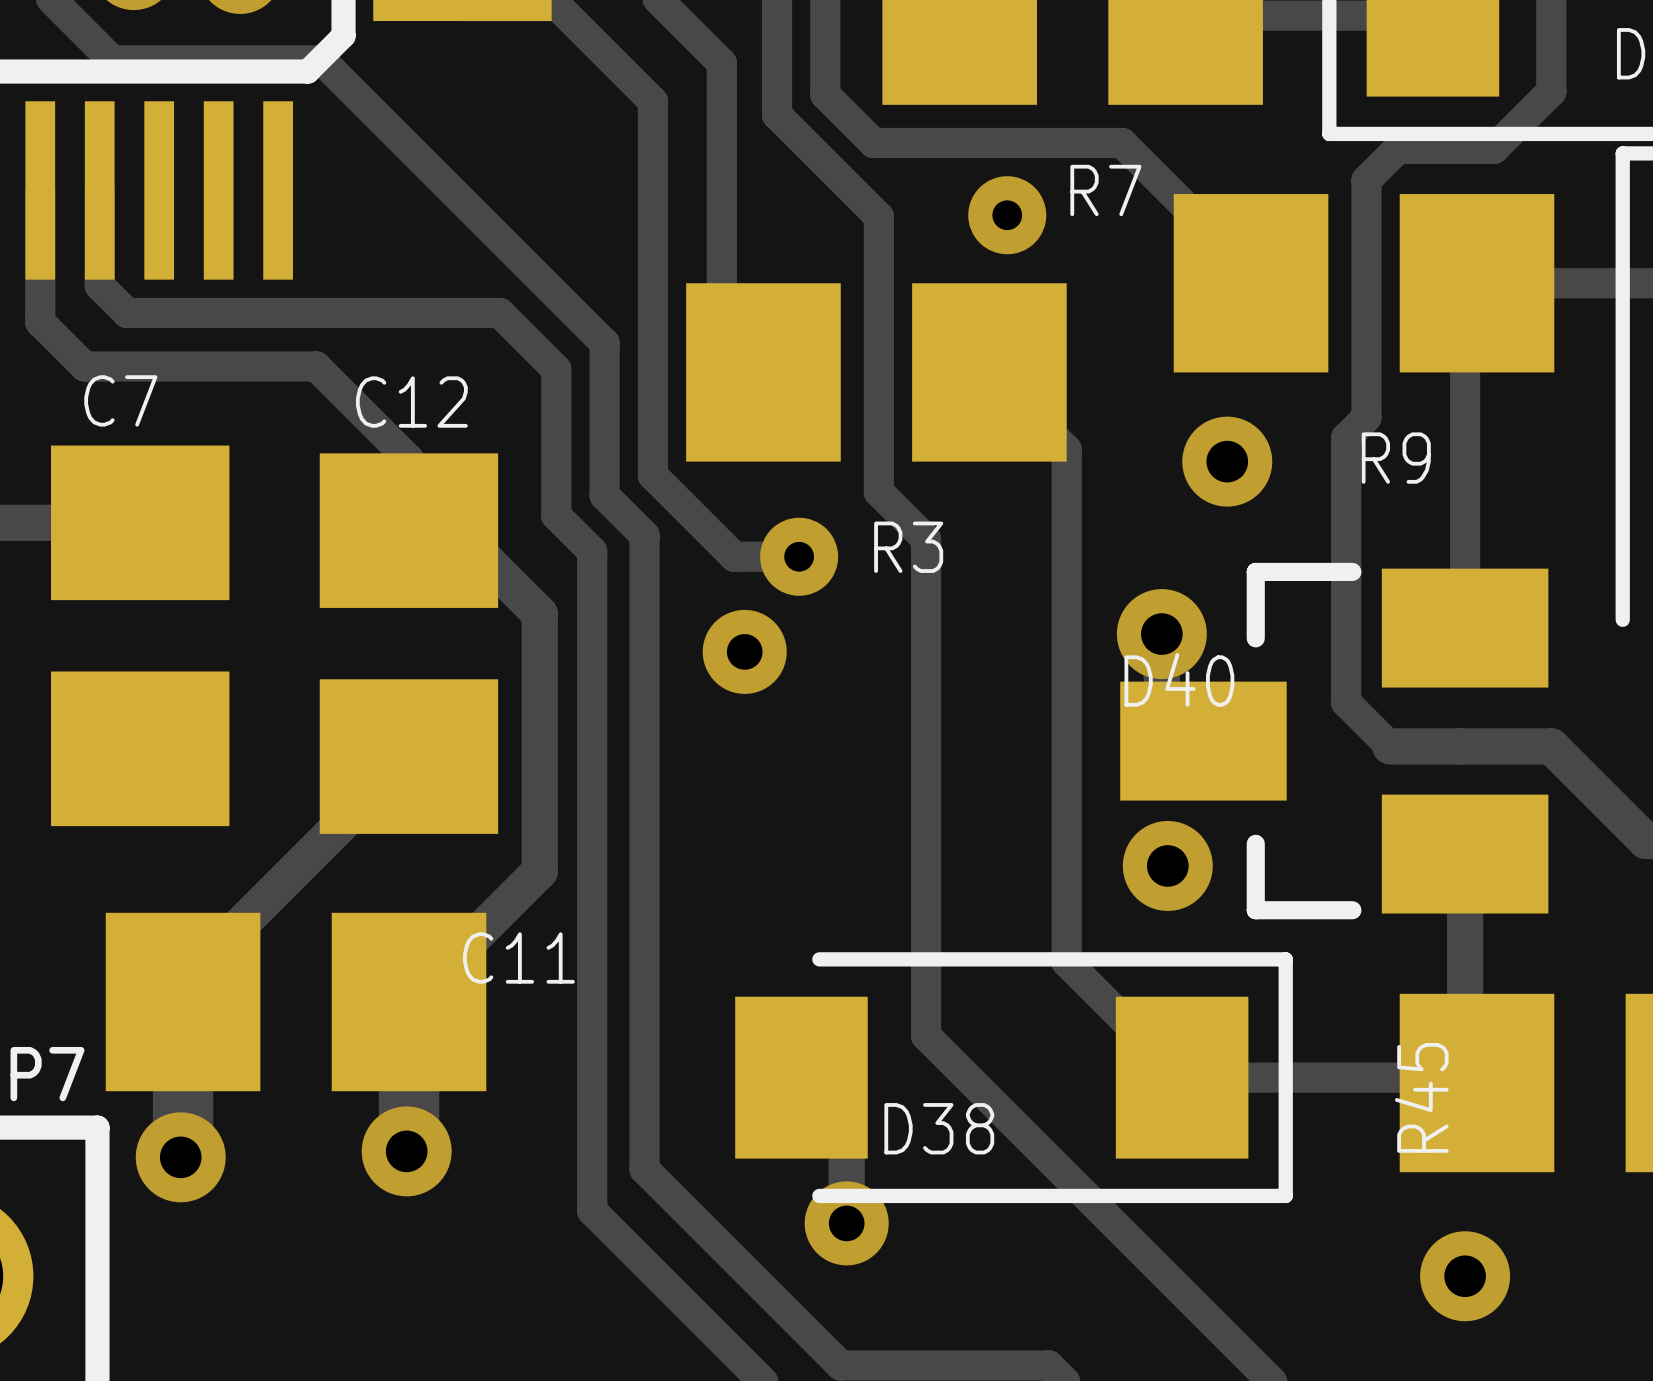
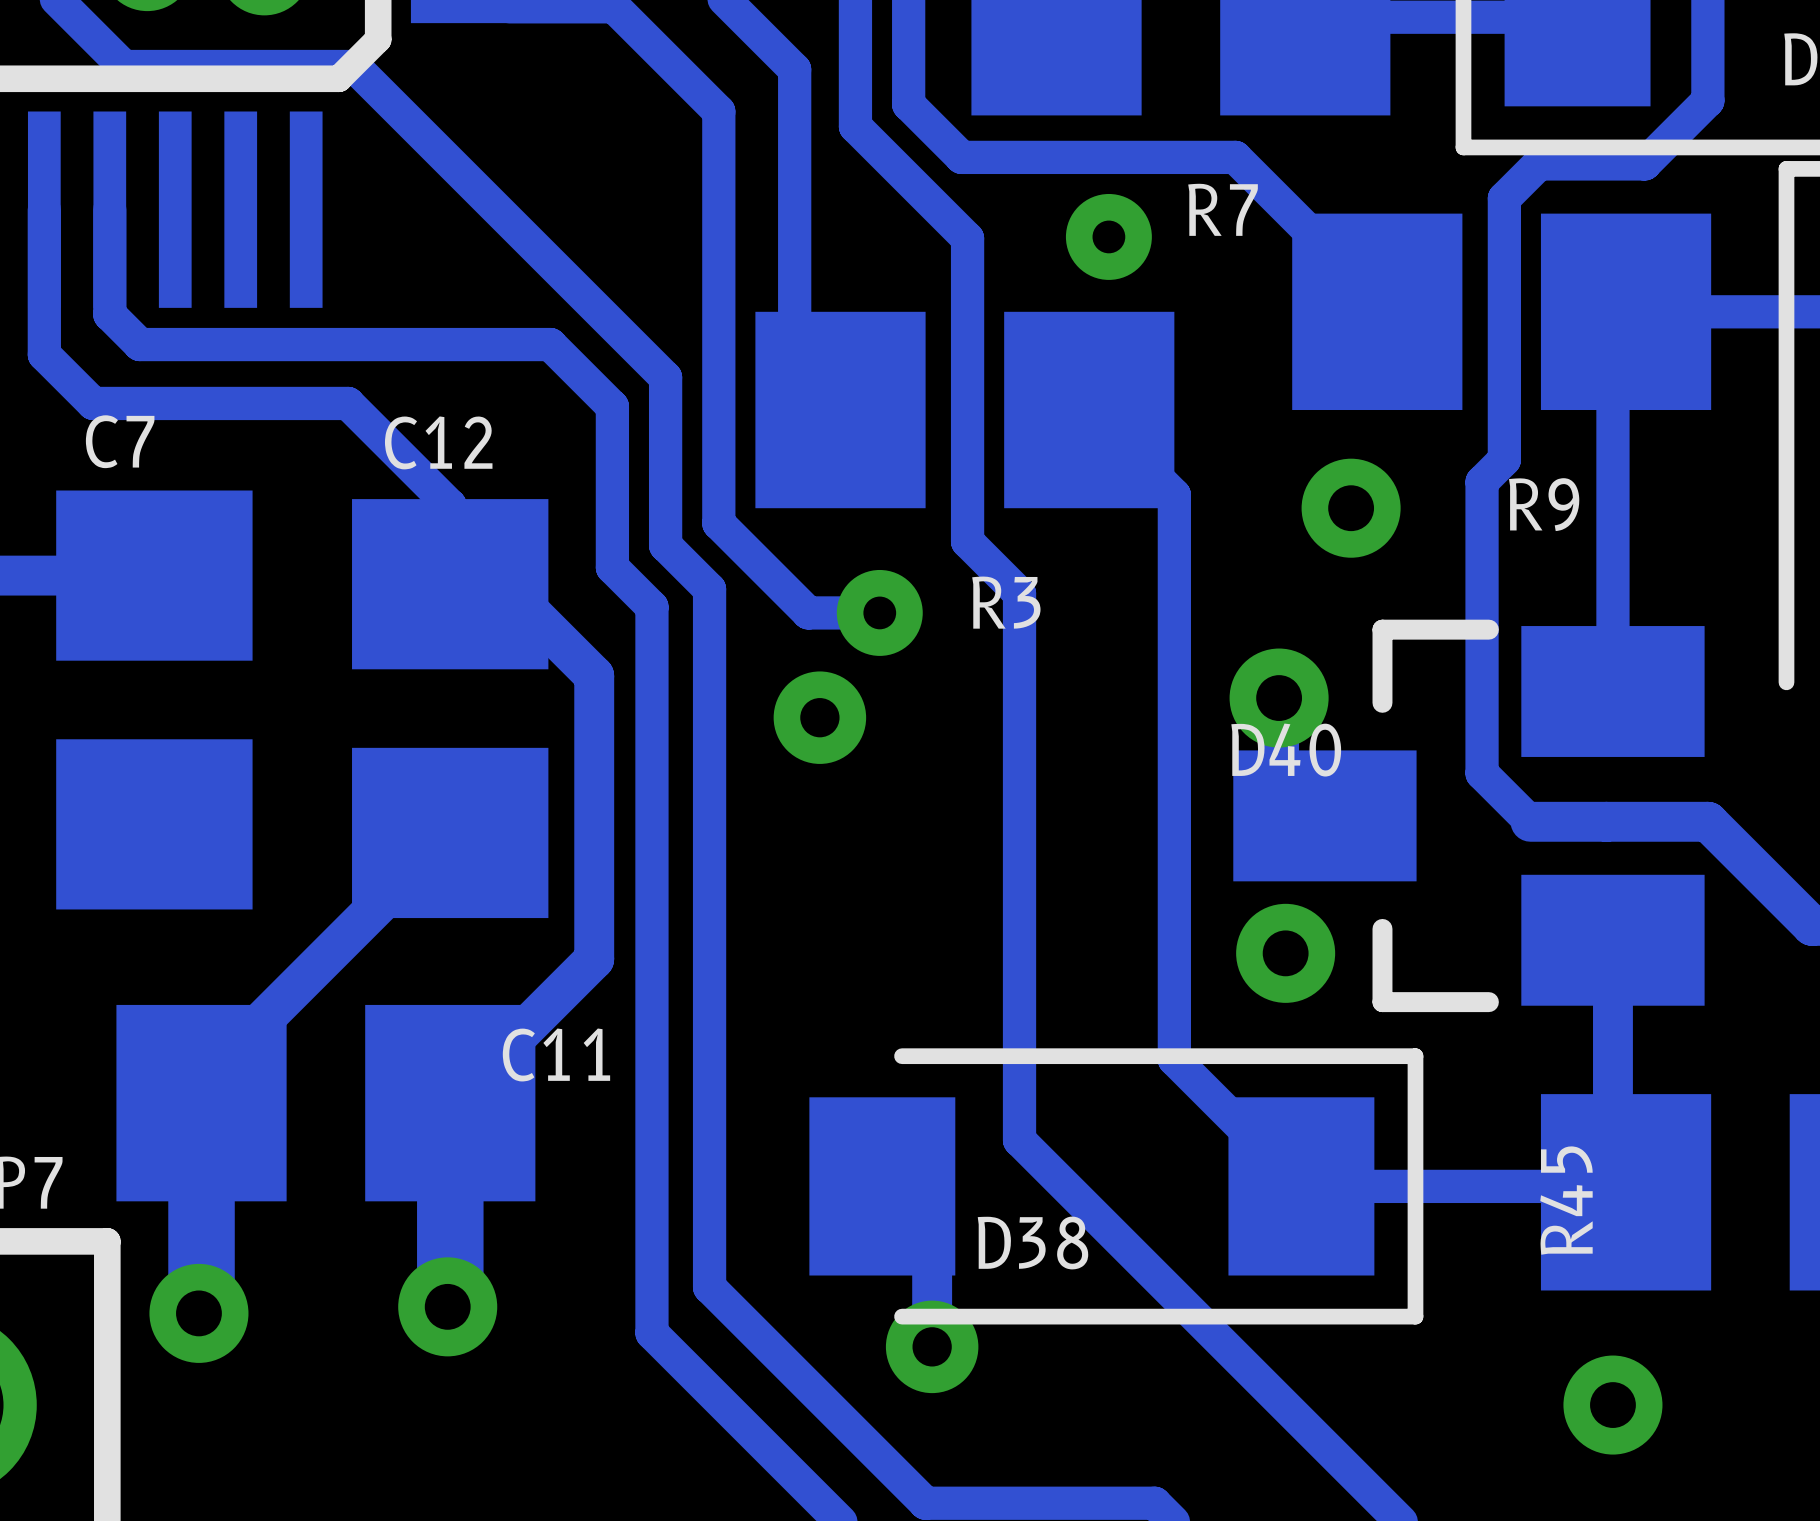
via position: (406, 1151) -> (447, 1306)
via position: (180, 1157) -> (198, 1313)

